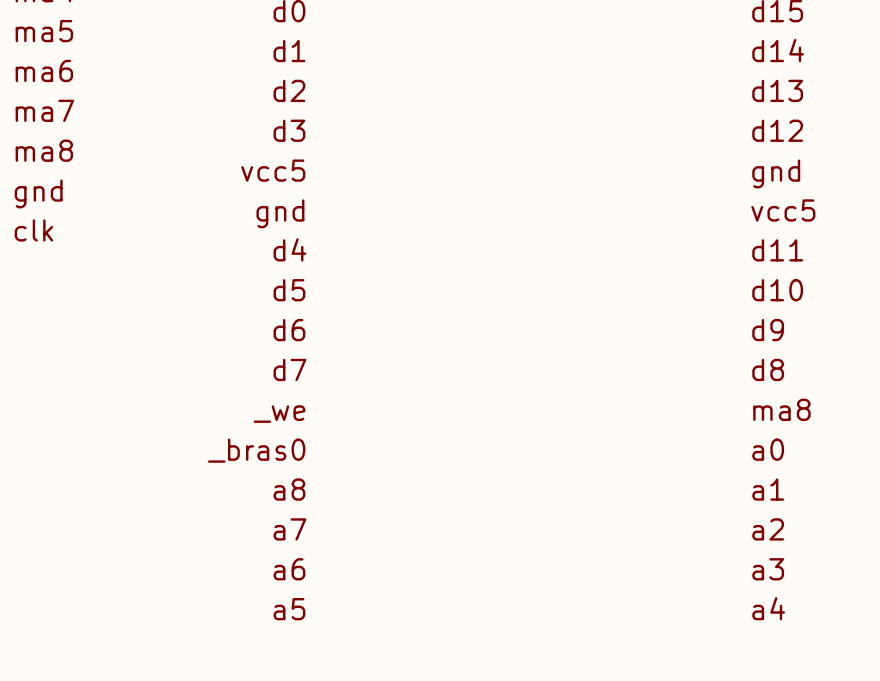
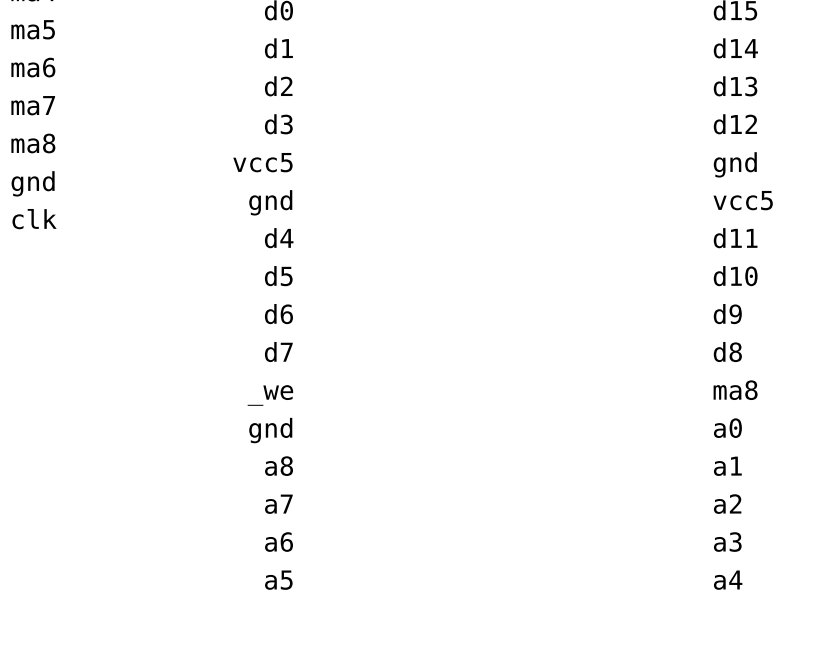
label: _bras0 (256, 450) -> gnd (270, 430)

